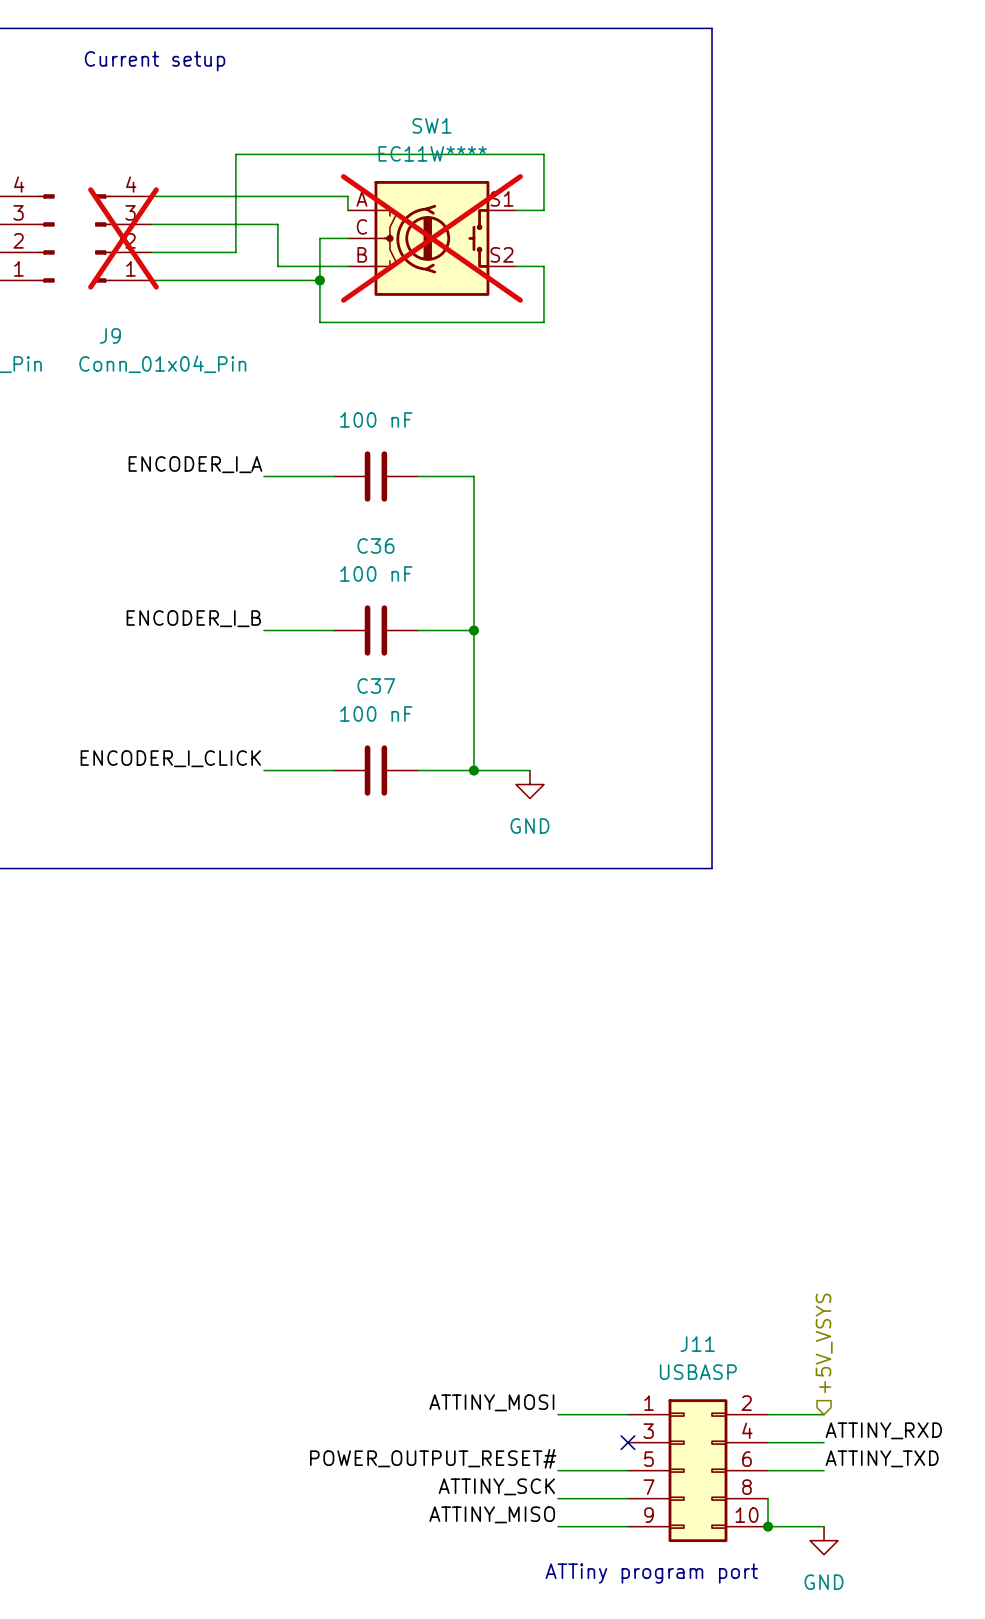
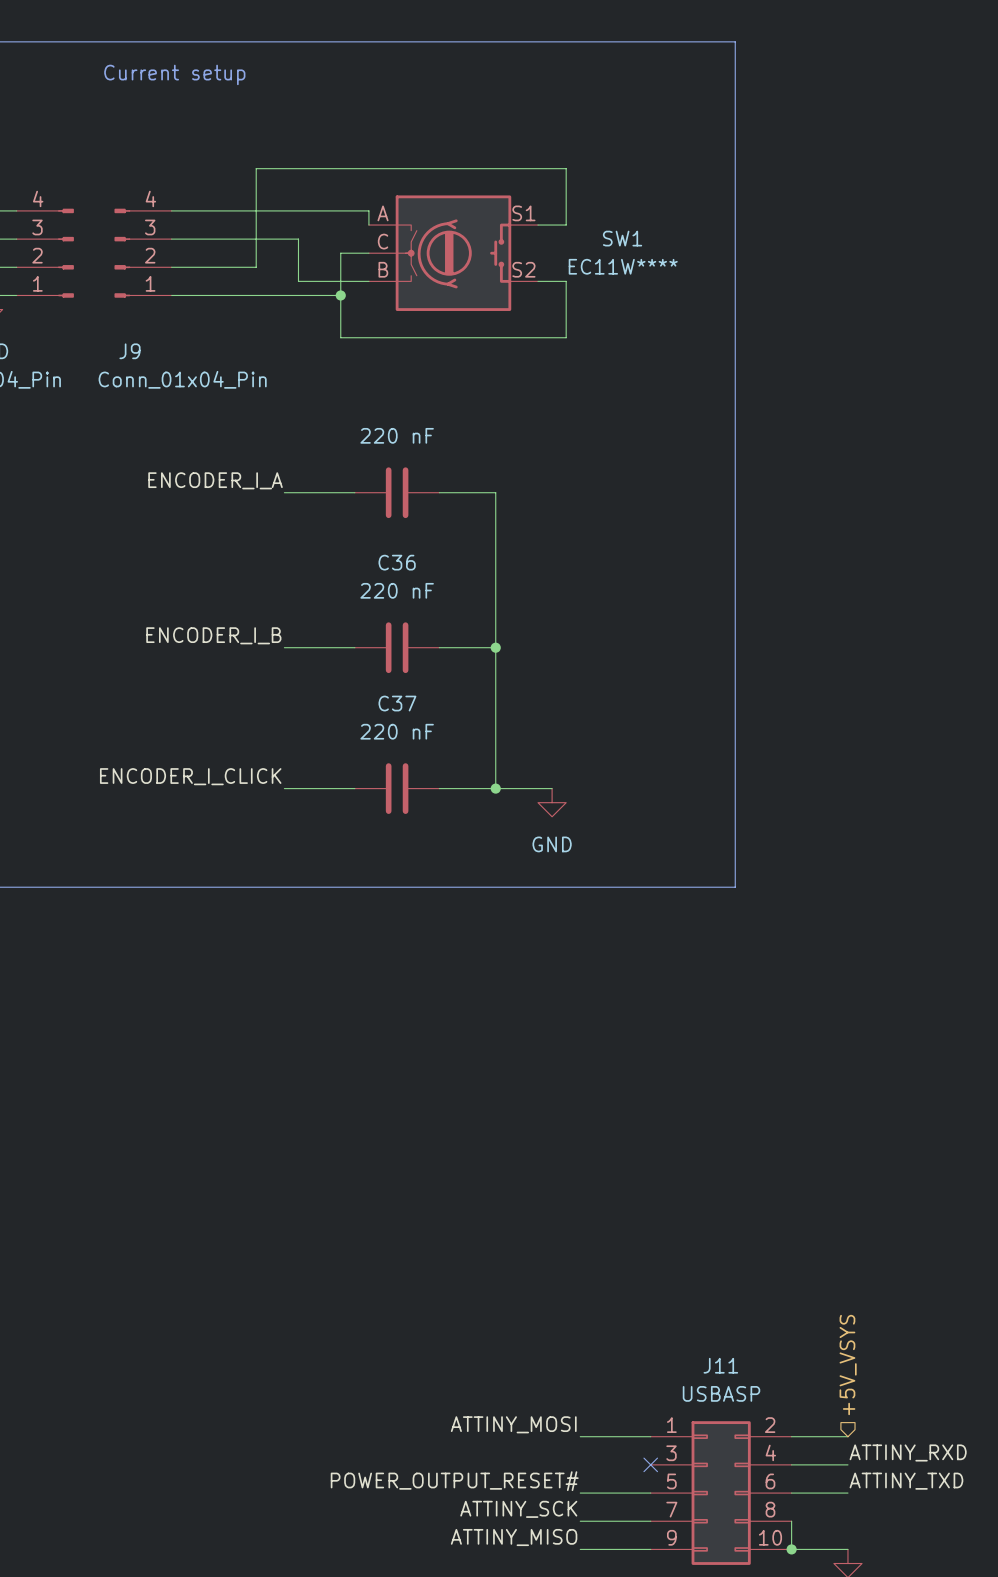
SW1 name position: SW1 (431, 125) -> SW1 (622, 238)
SW1 value position: EC11W**** (432, 153) -> EC11W**** (623, 266)
J9 do-not-place cross: (123, 238) -> none
SW1 do-not-place cross: (431, 238) -> none
part value: 100 nF (376, 419) -> 220 nF (397, 435)
C36 value: 100 nF (376, 573) -> 220 nF (397, 590)
C37 value: 100 nF (376, 714) -> 220 nF (397, 731)

